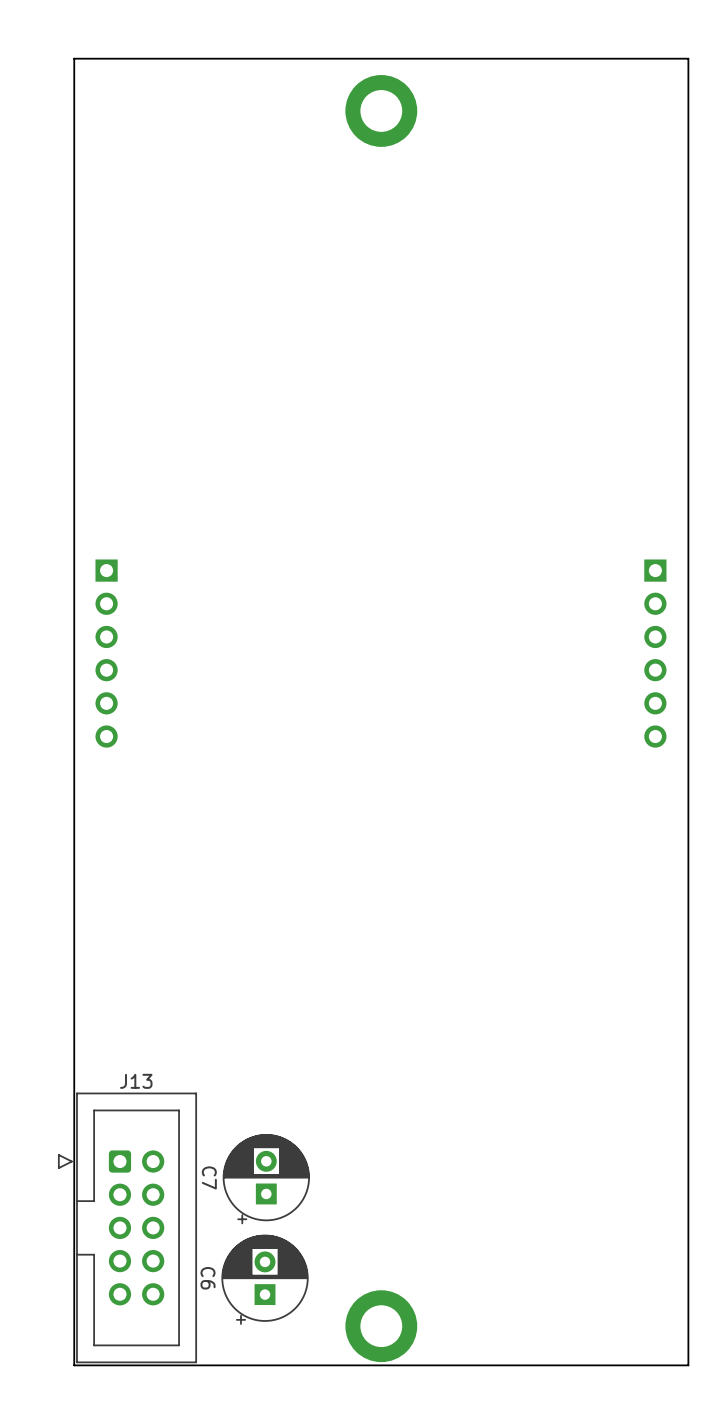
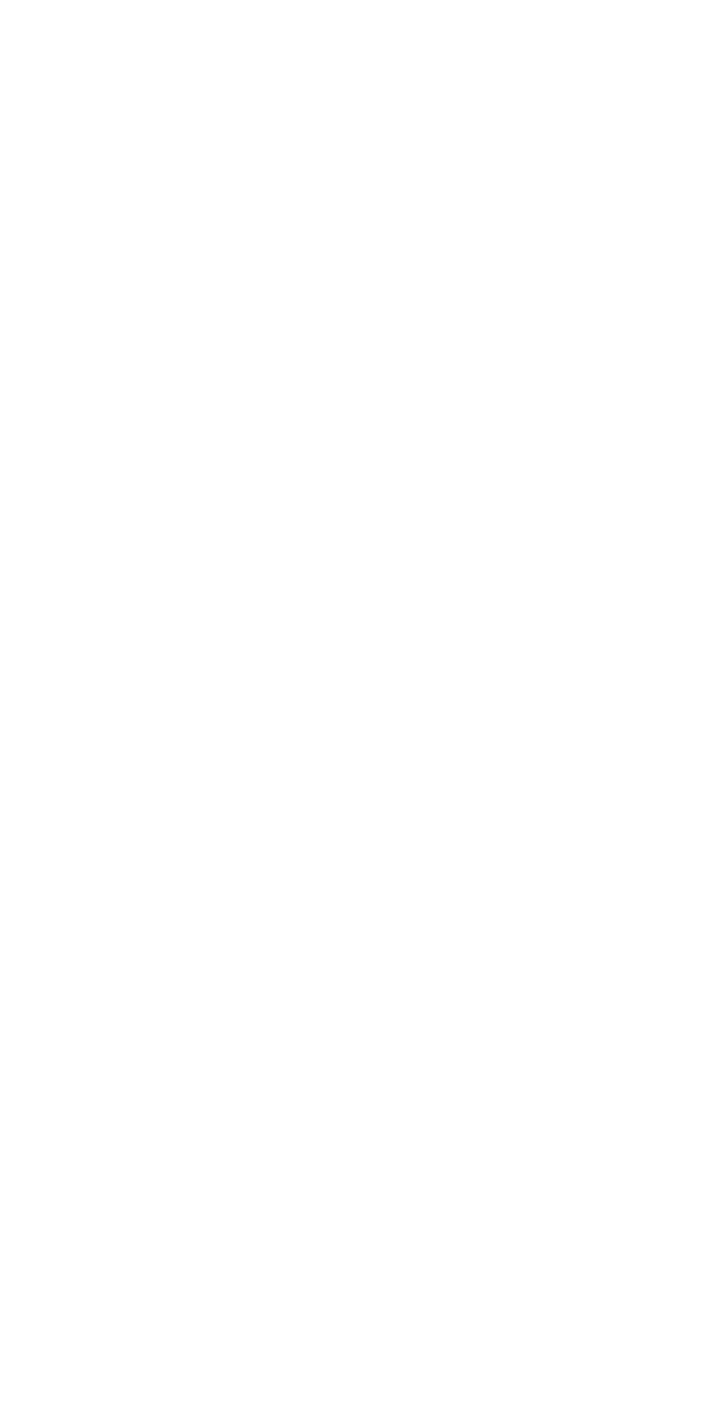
board edge: (688, 58) (74, 58) (74, 1365) (688, 1365) (688, 58) -> none
part: (381, 110) -> none
part: (106, 653) -> none
part: (655, 653) -> none
C7: (266, 1179) -> none
J13: (127, 1227) -> none
C6: (265, 1279) -> none
part: (381, 1326) -> none

